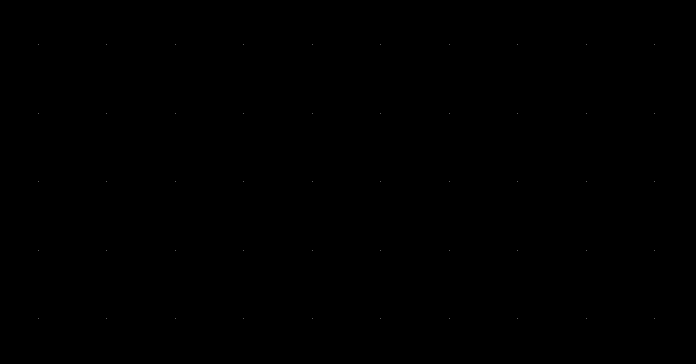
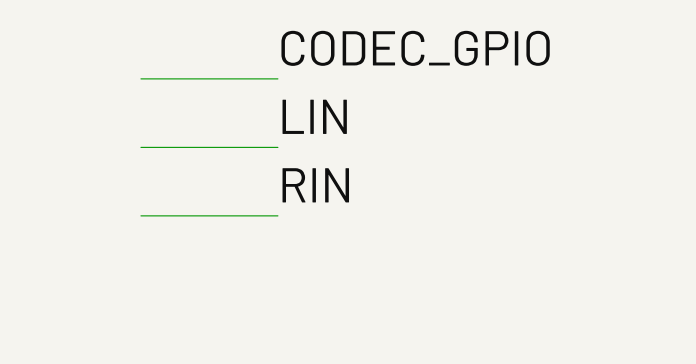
label: none -> CODEC_GPIO (415, 48)
wire: none -> (140, 78) (277, 78)
label: none -> LIN (314, 116)
wire: none -> (140, 147) (277, 147)
label: none -> RIN (315, 185)
wire: none -> (140, 215) (277, 215)

